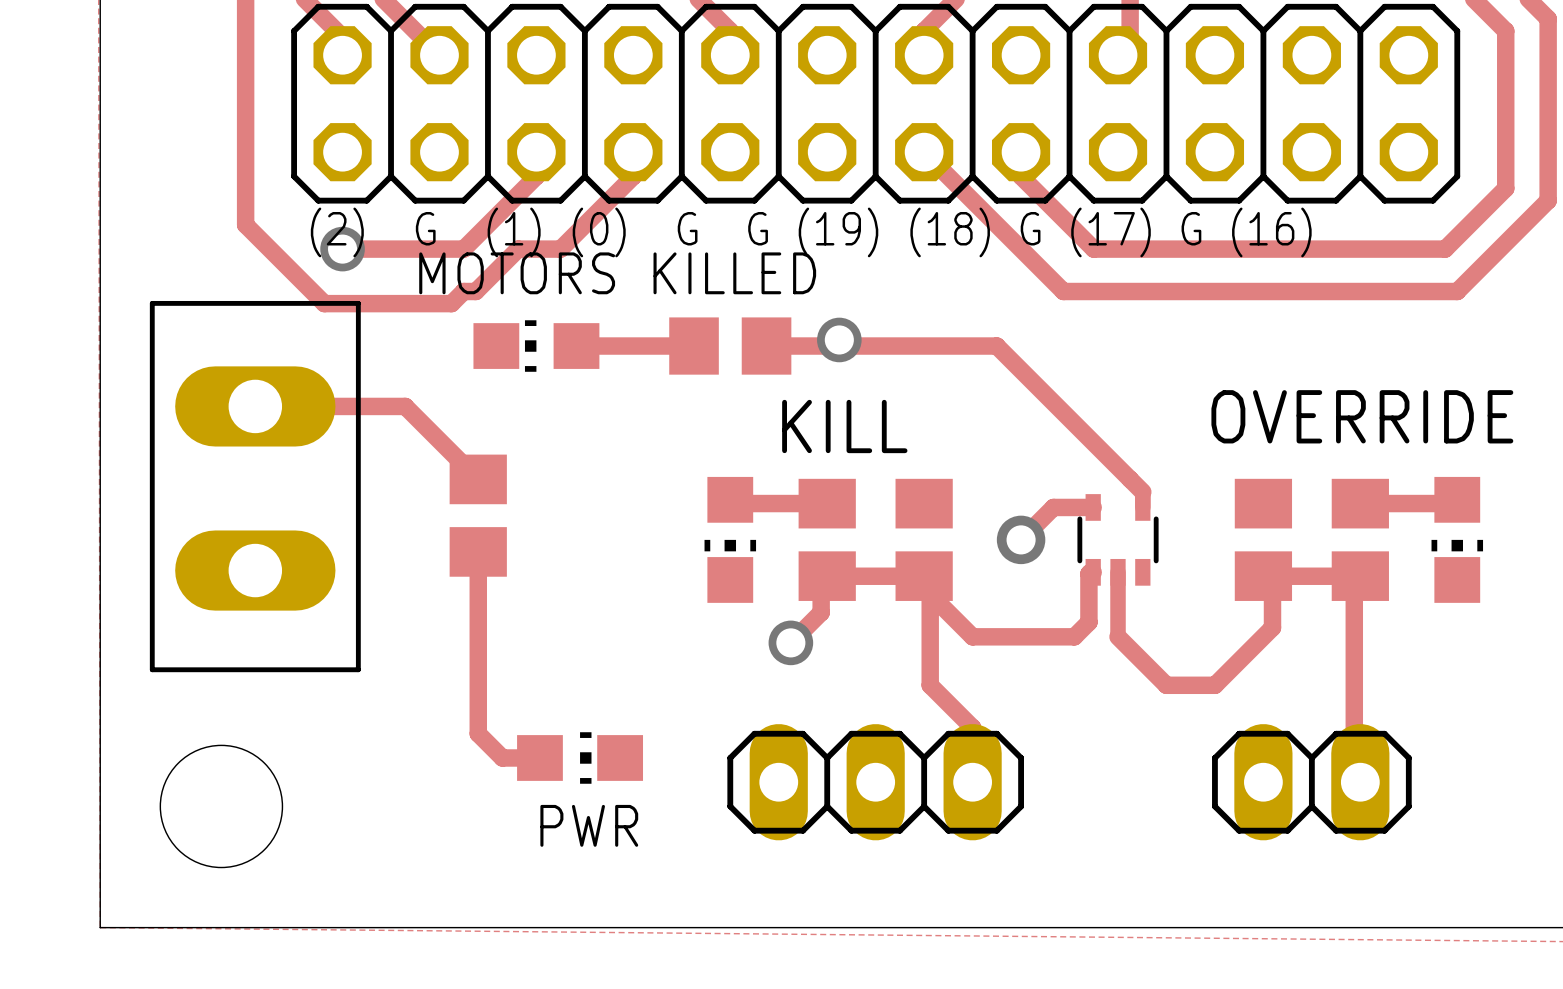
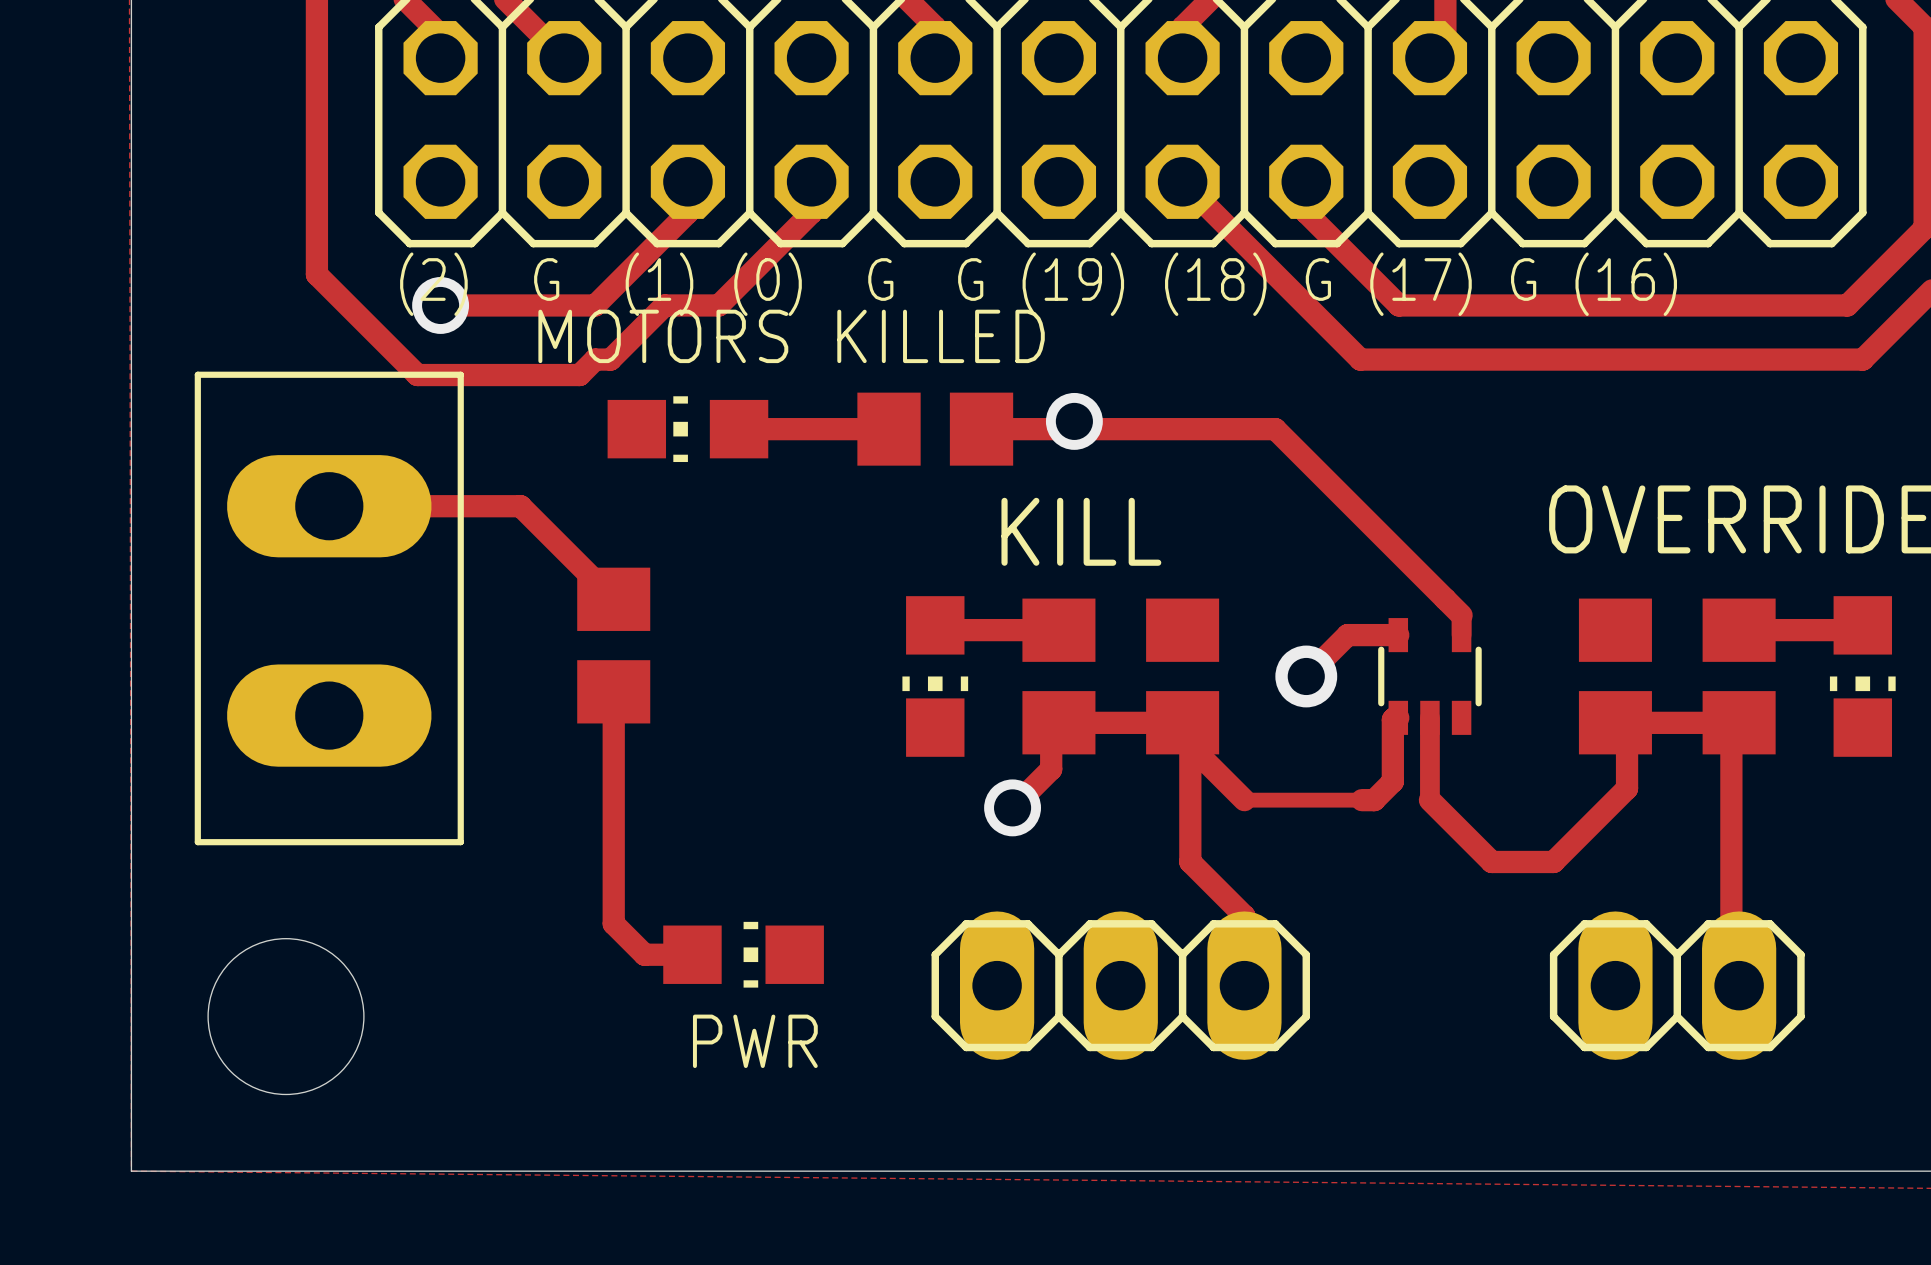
track width: thick (972, 636) (1064, 636) -> thin (1244, 800) (1361, 800)

